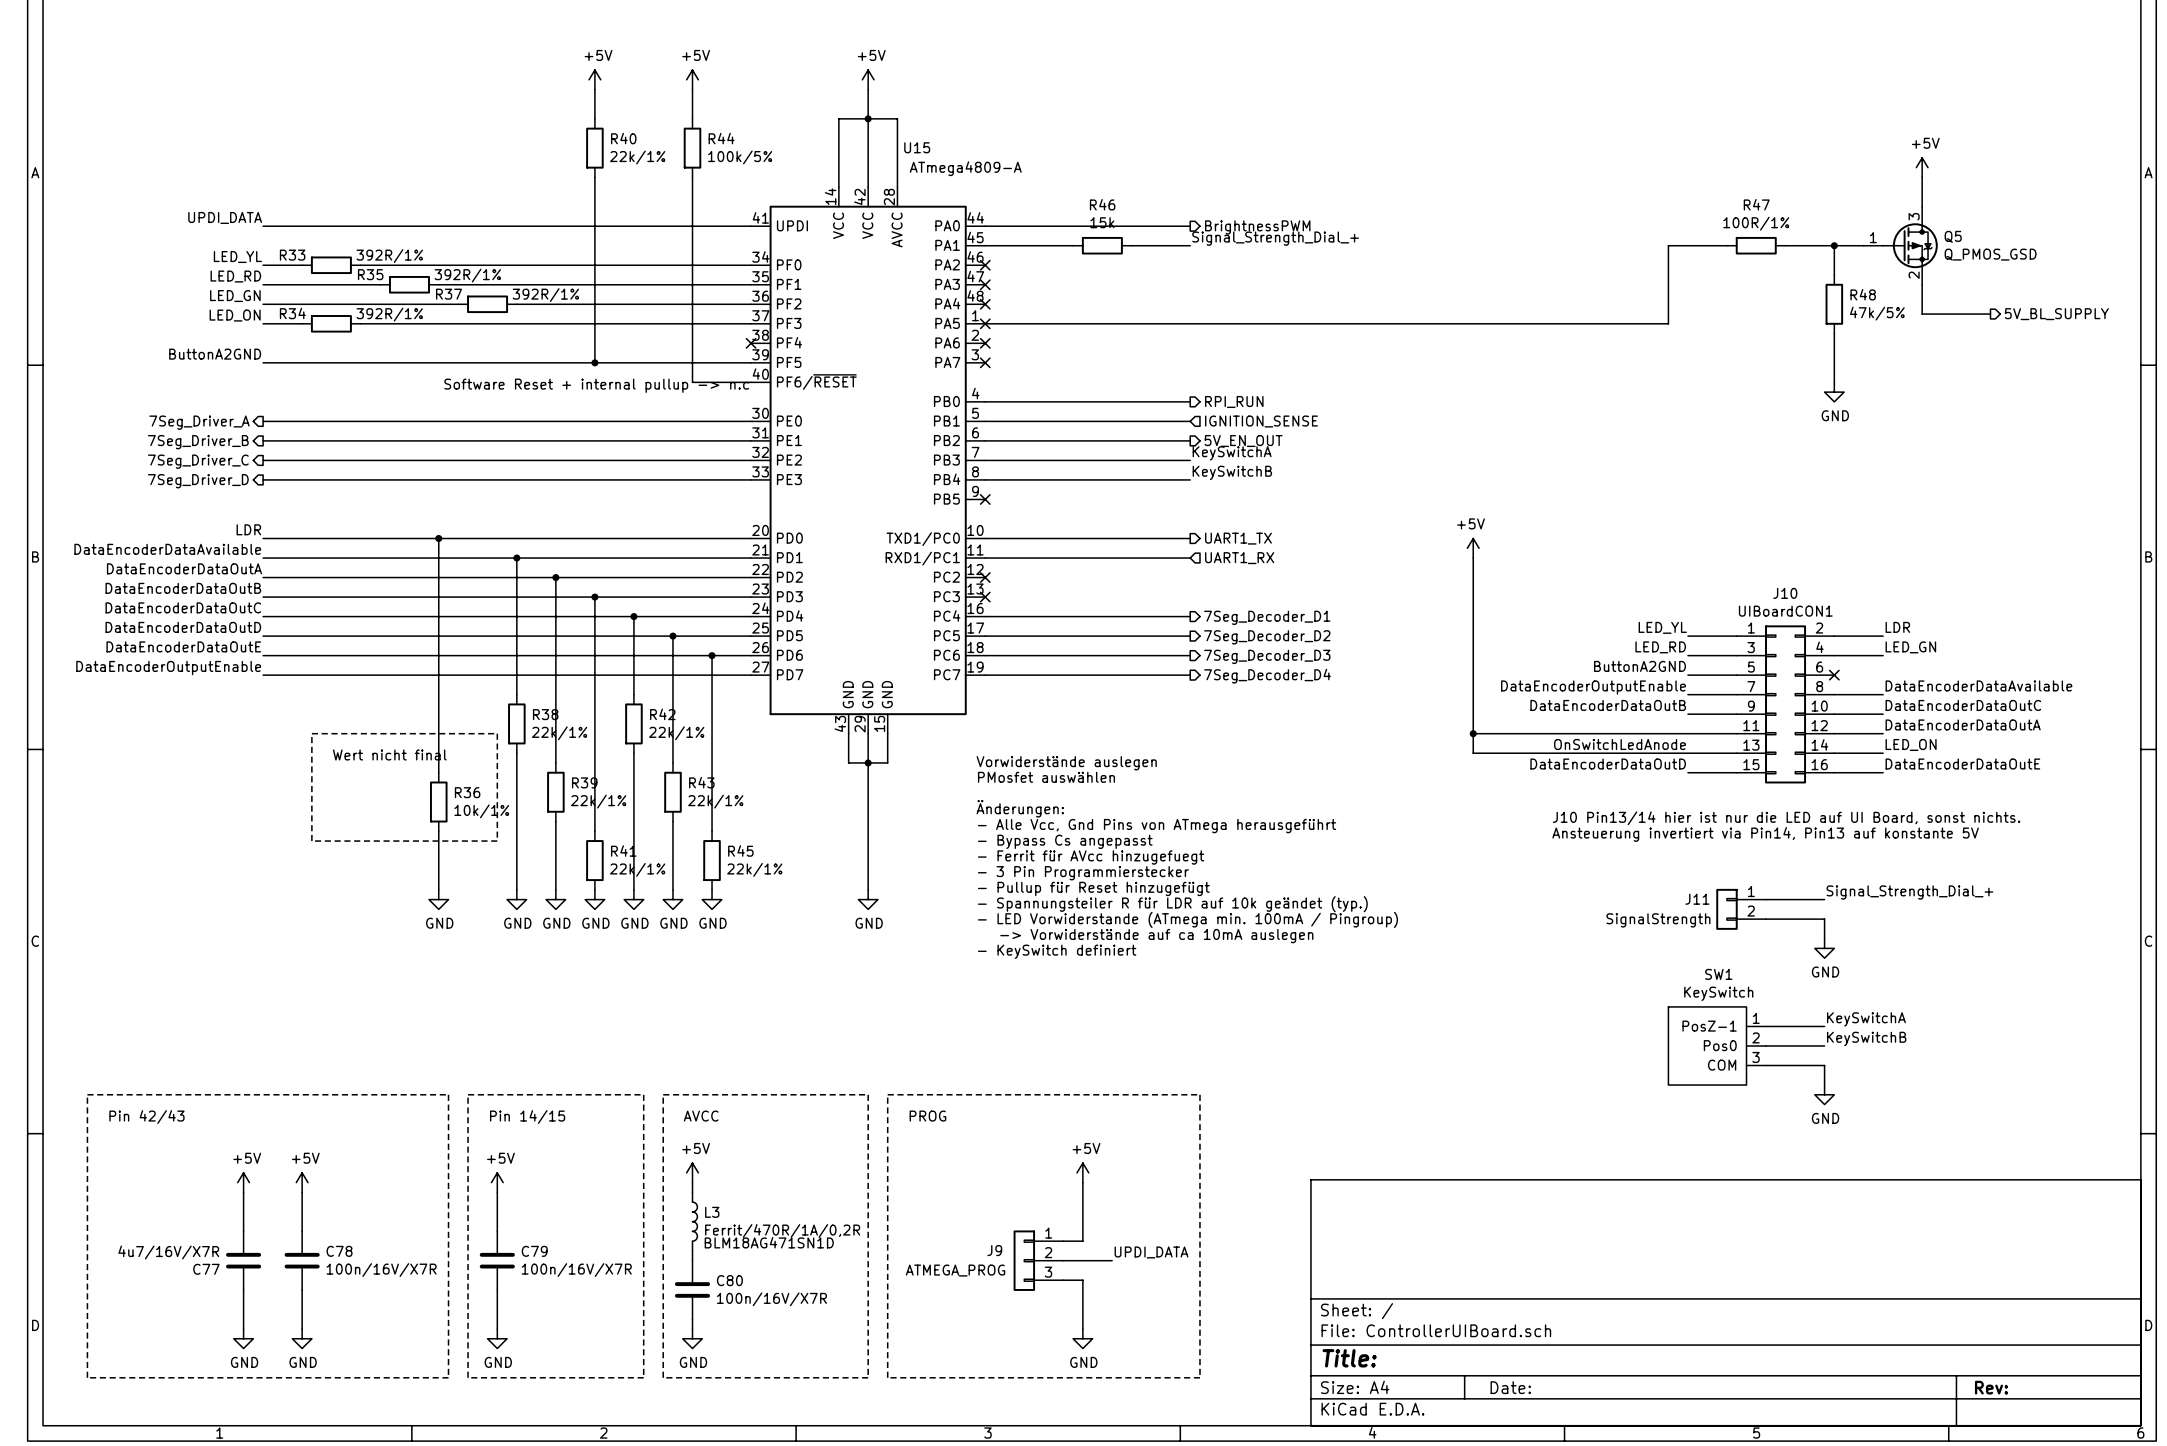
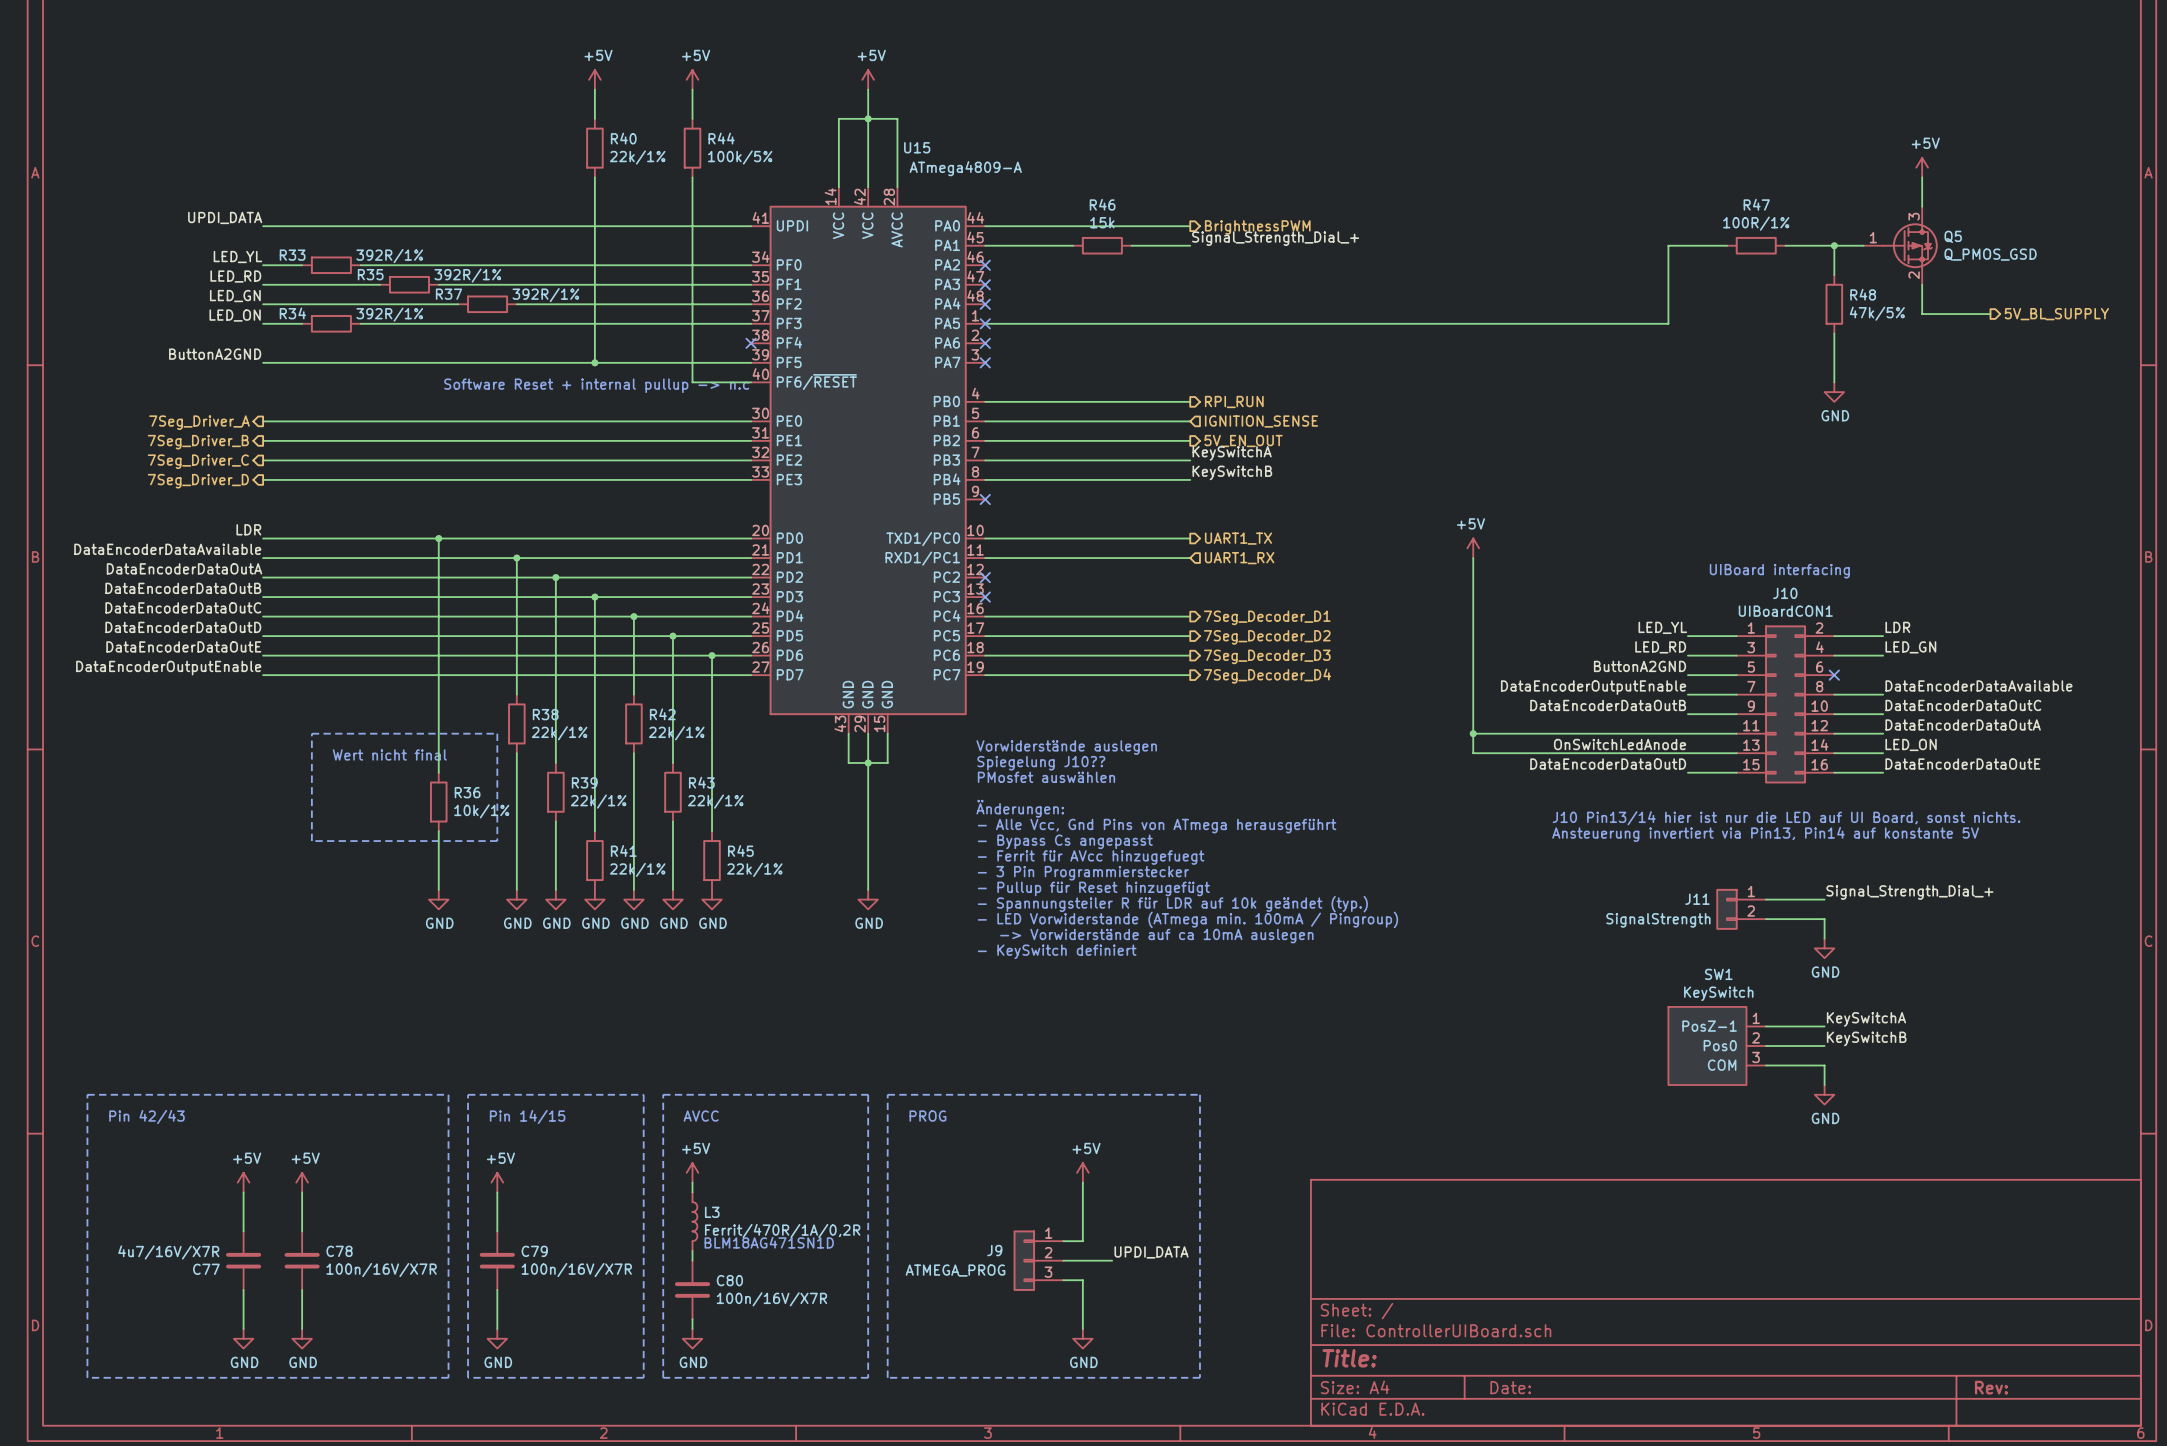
text: none -> UIBoard interfacing (1779, 571)
text: none -> Vorwiderstände auslegen (1066, 747)
text: Vorwiderstände auslegen (1066, 763) -> Spiegelung J10?? (1041, 763)
text: Ansteuerung invertiert via Pin14, Pin13 auf konstante 5V (1765, 834) -> Ansteuerung invertiert via Pin13, Pin14 auf konstante 5V (1765, 834)

